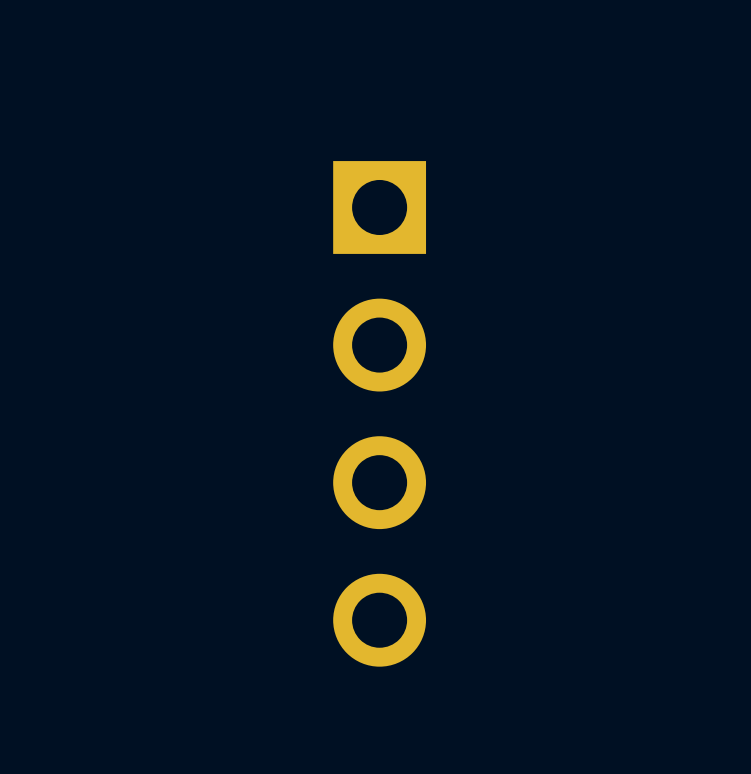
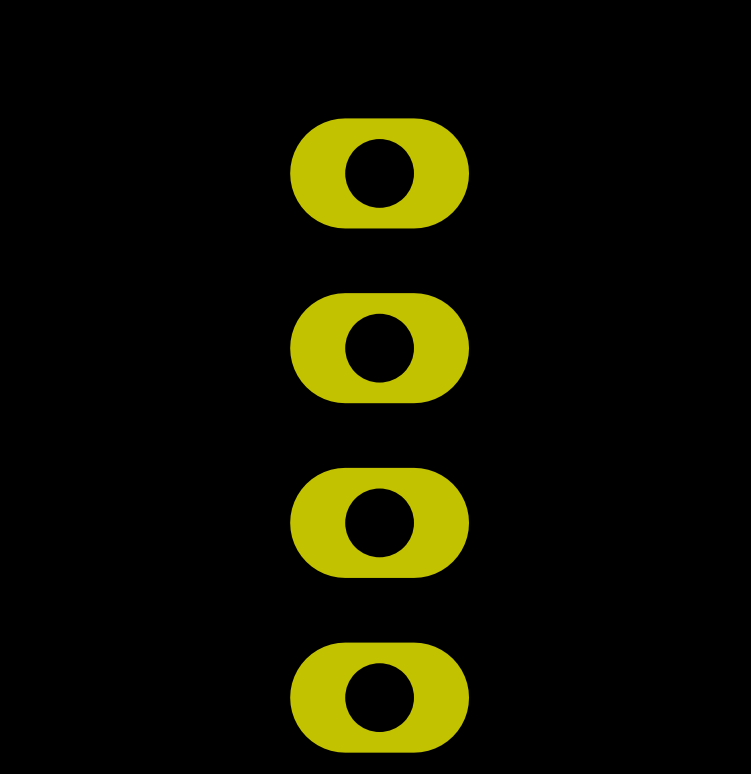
part footprint: [333, 161, 427, 667] -> [290, 118, 470, 753]

